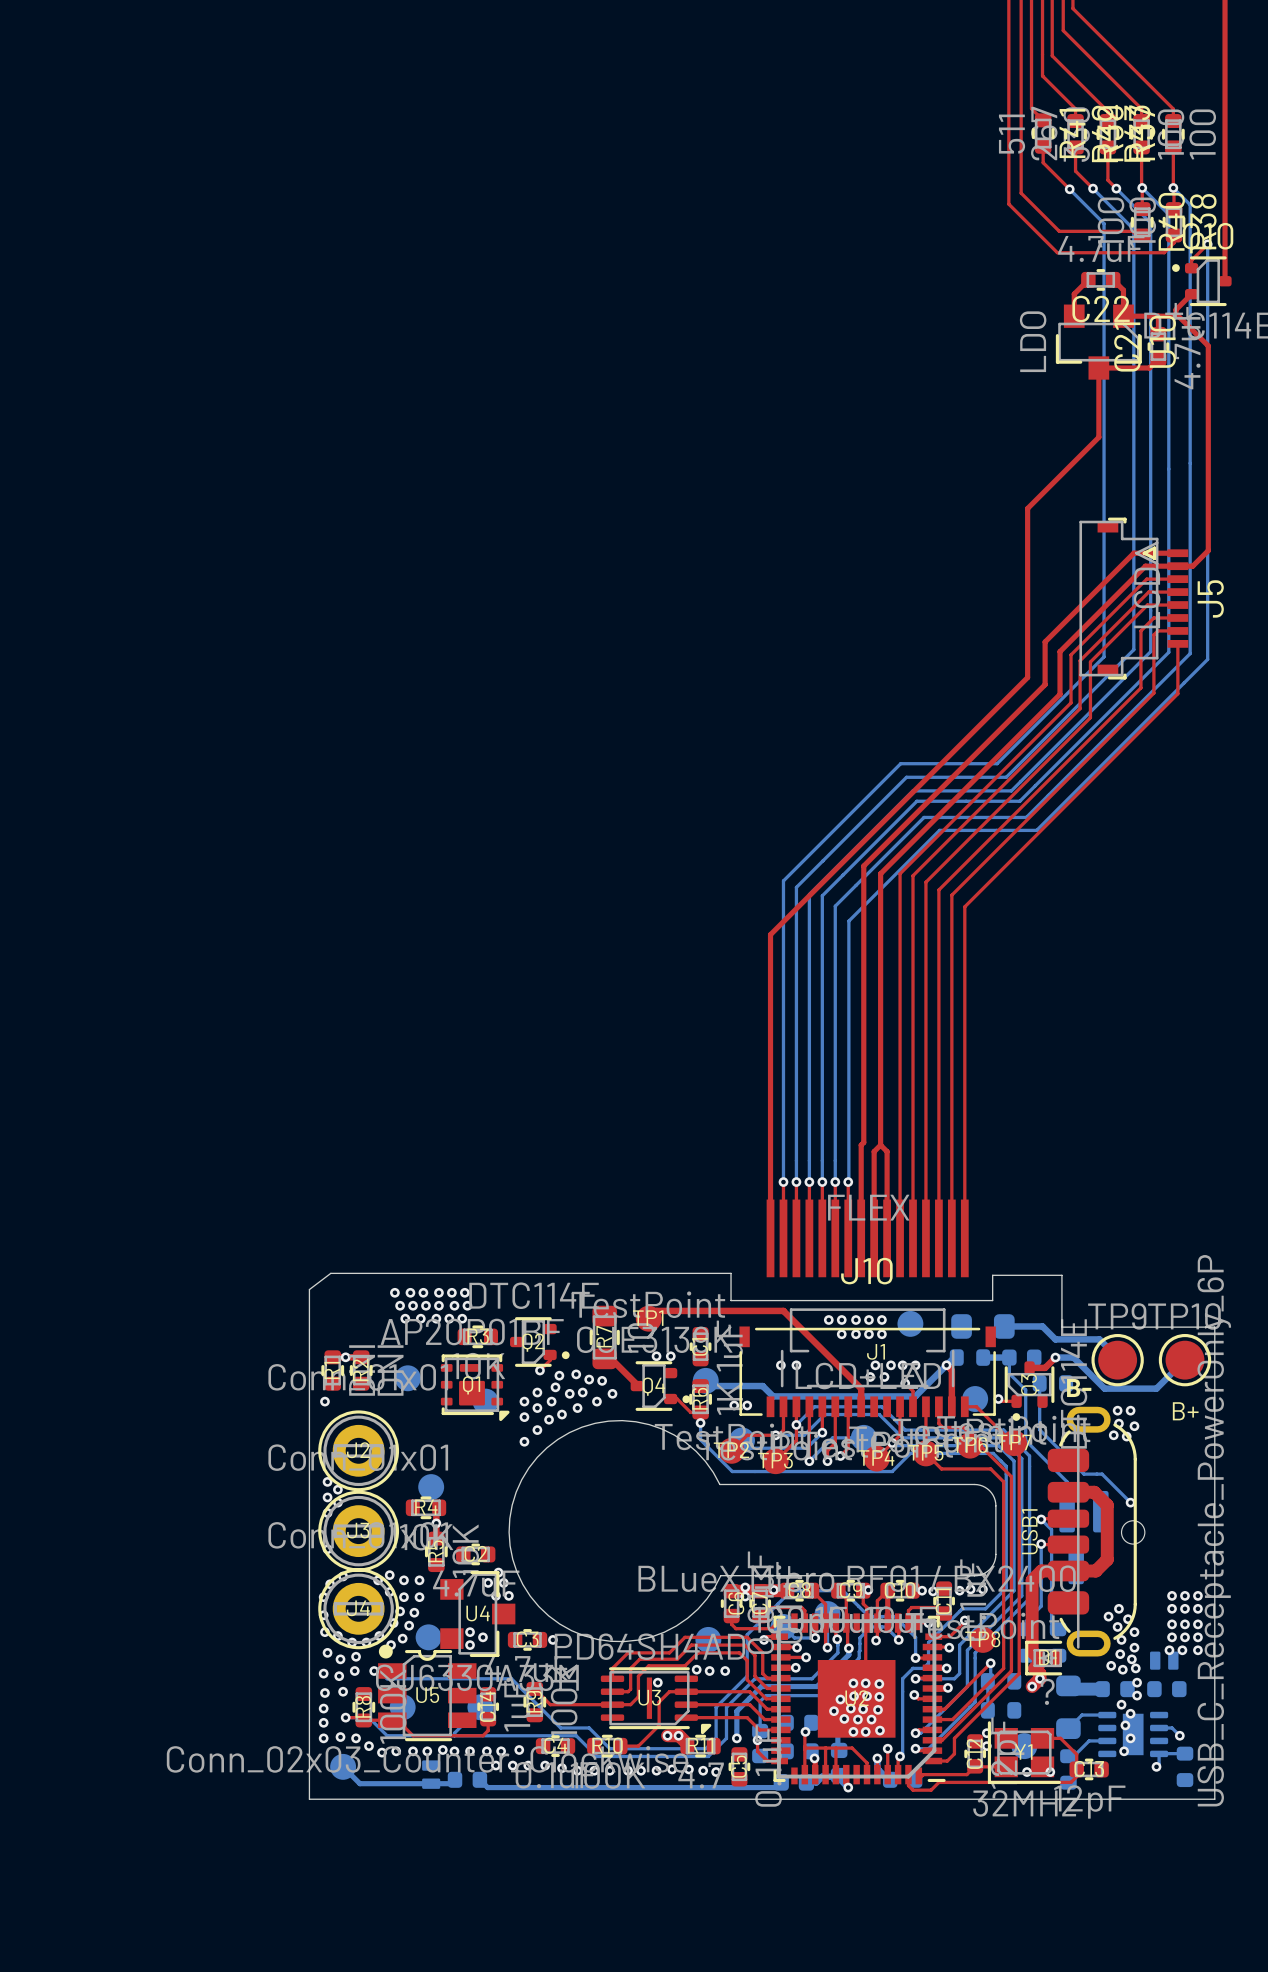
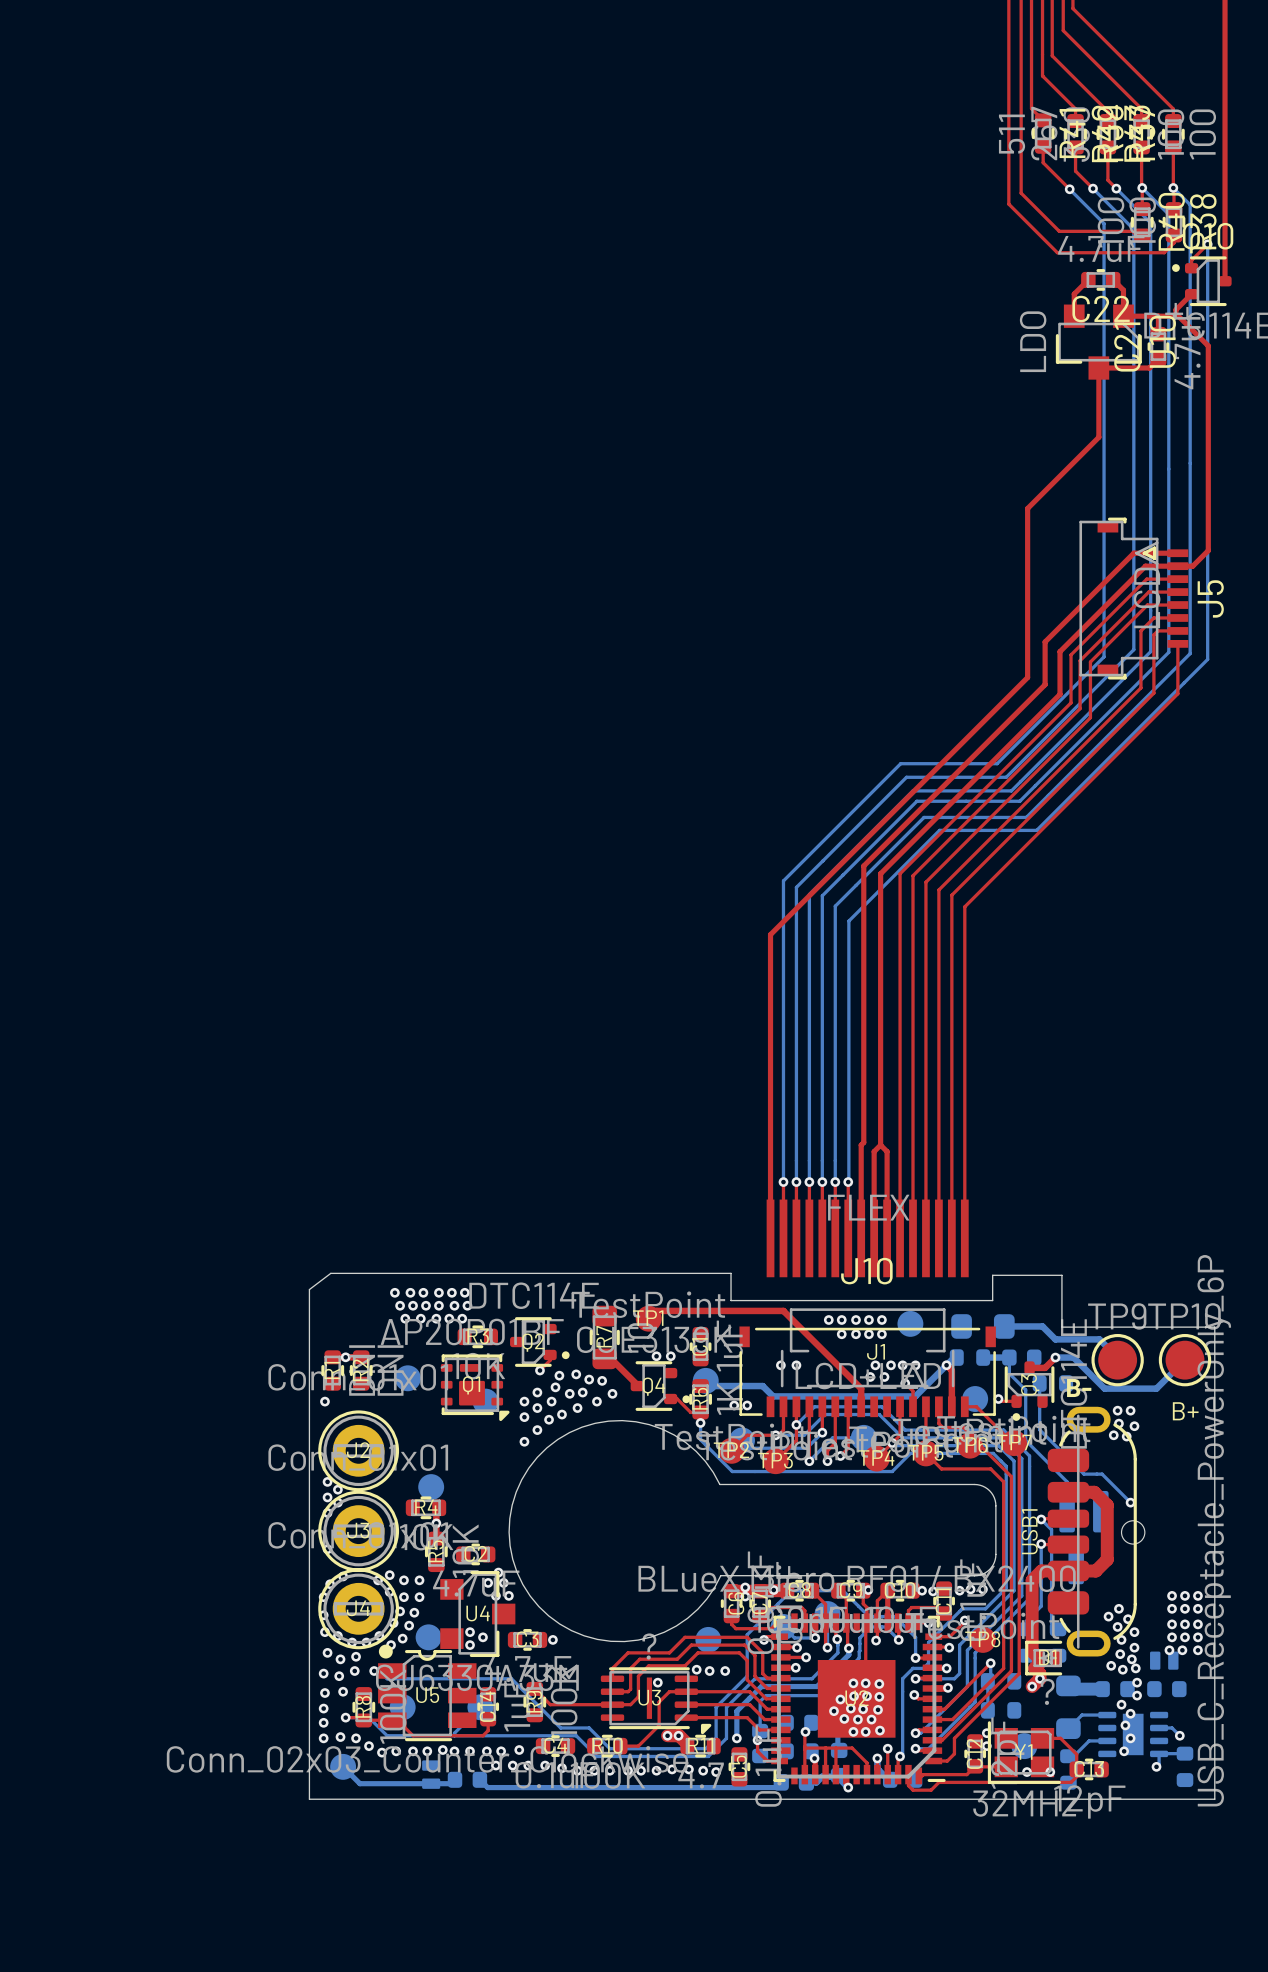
U3 value: PD64SH4AD (649, 1646) -> ? (649, 1646)

